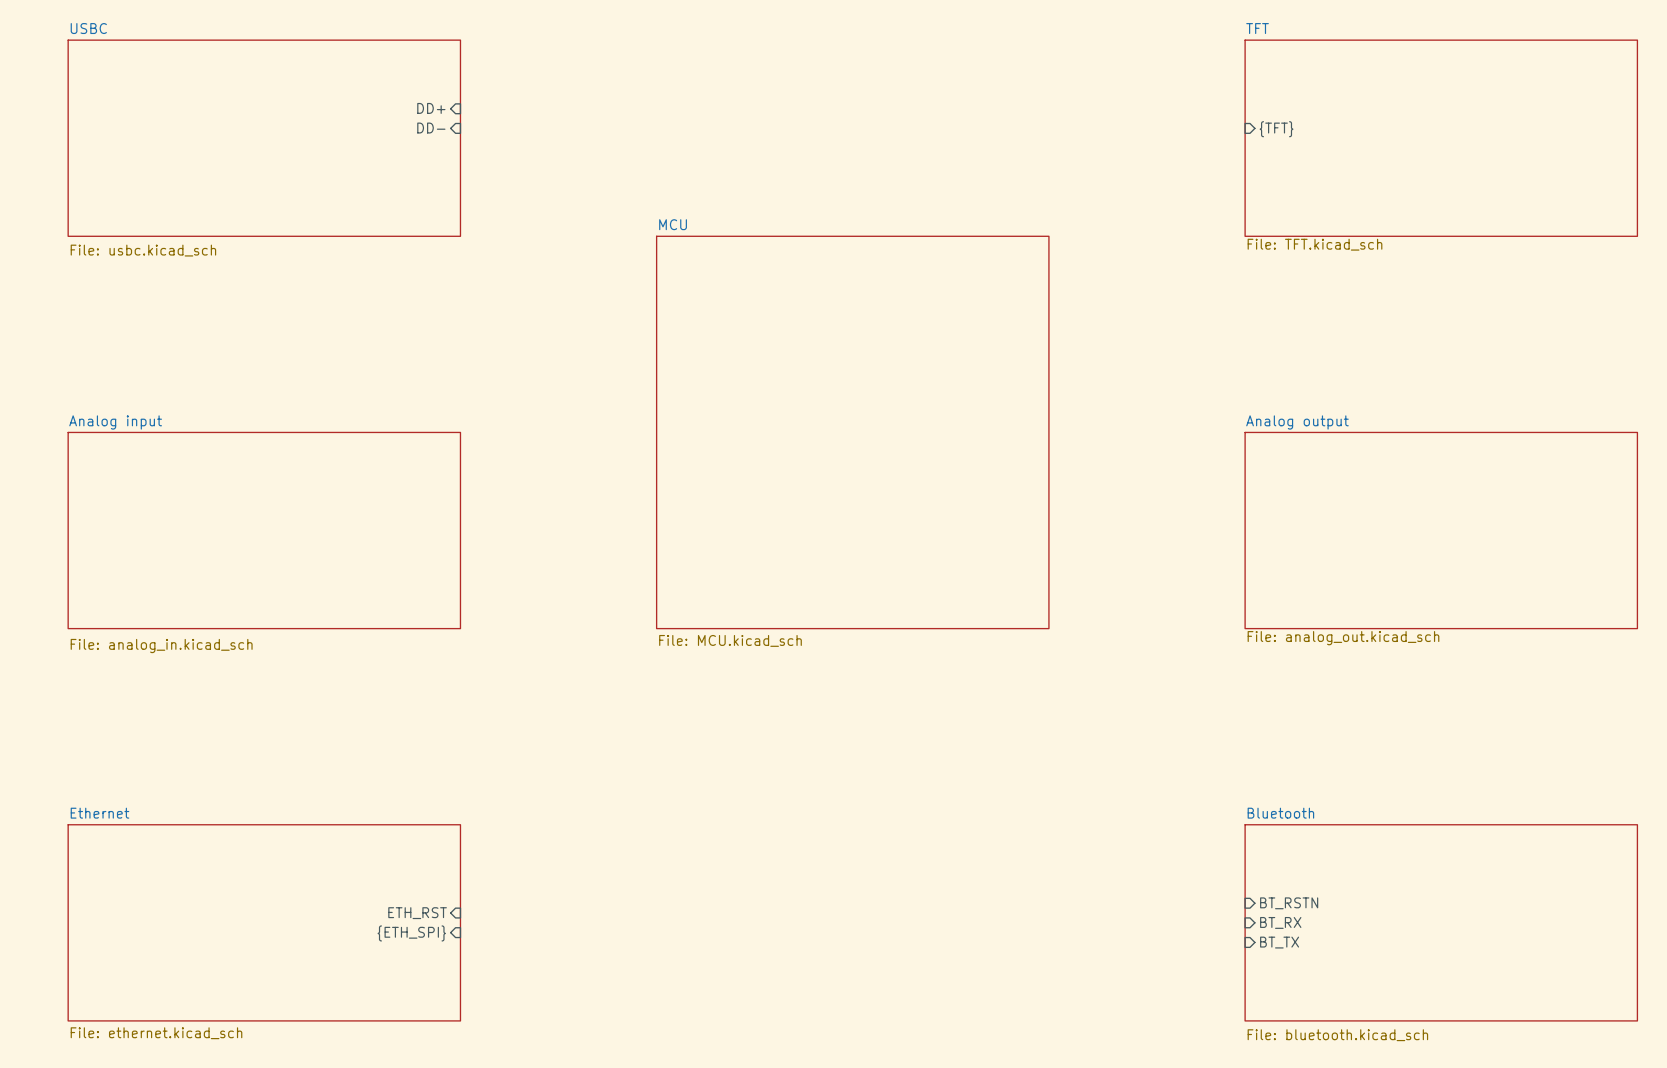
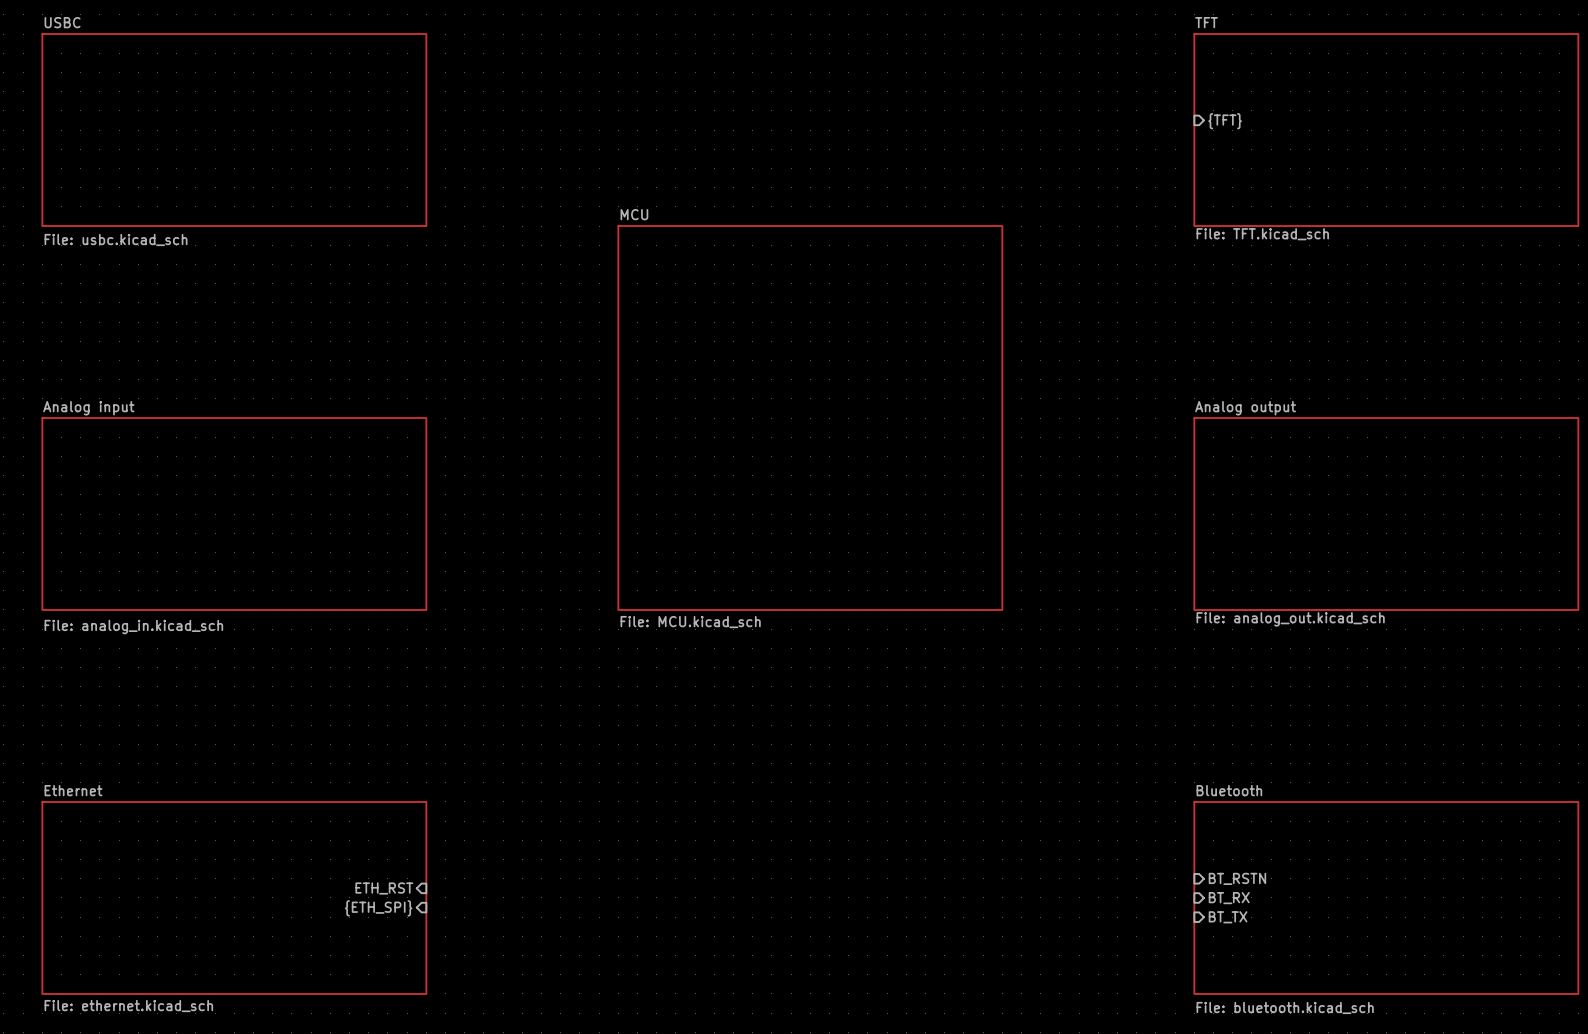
sheet pin: DD+ (431, 108) -> none
sheet pin: DD- (431, 128) -> none

